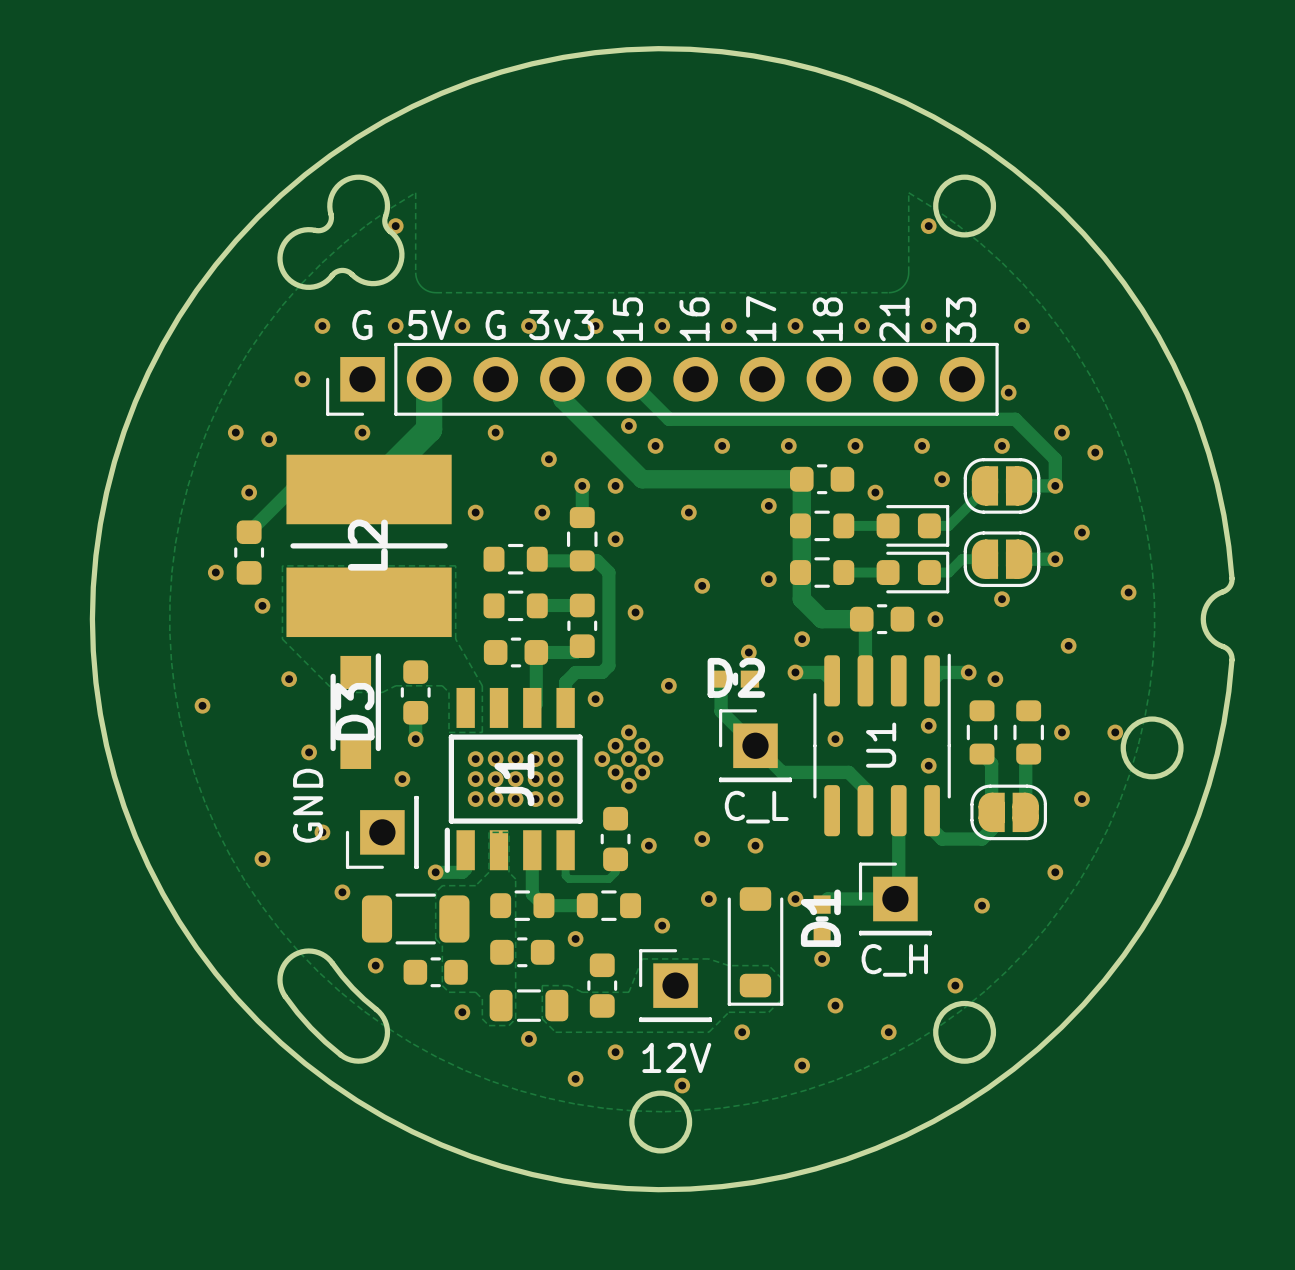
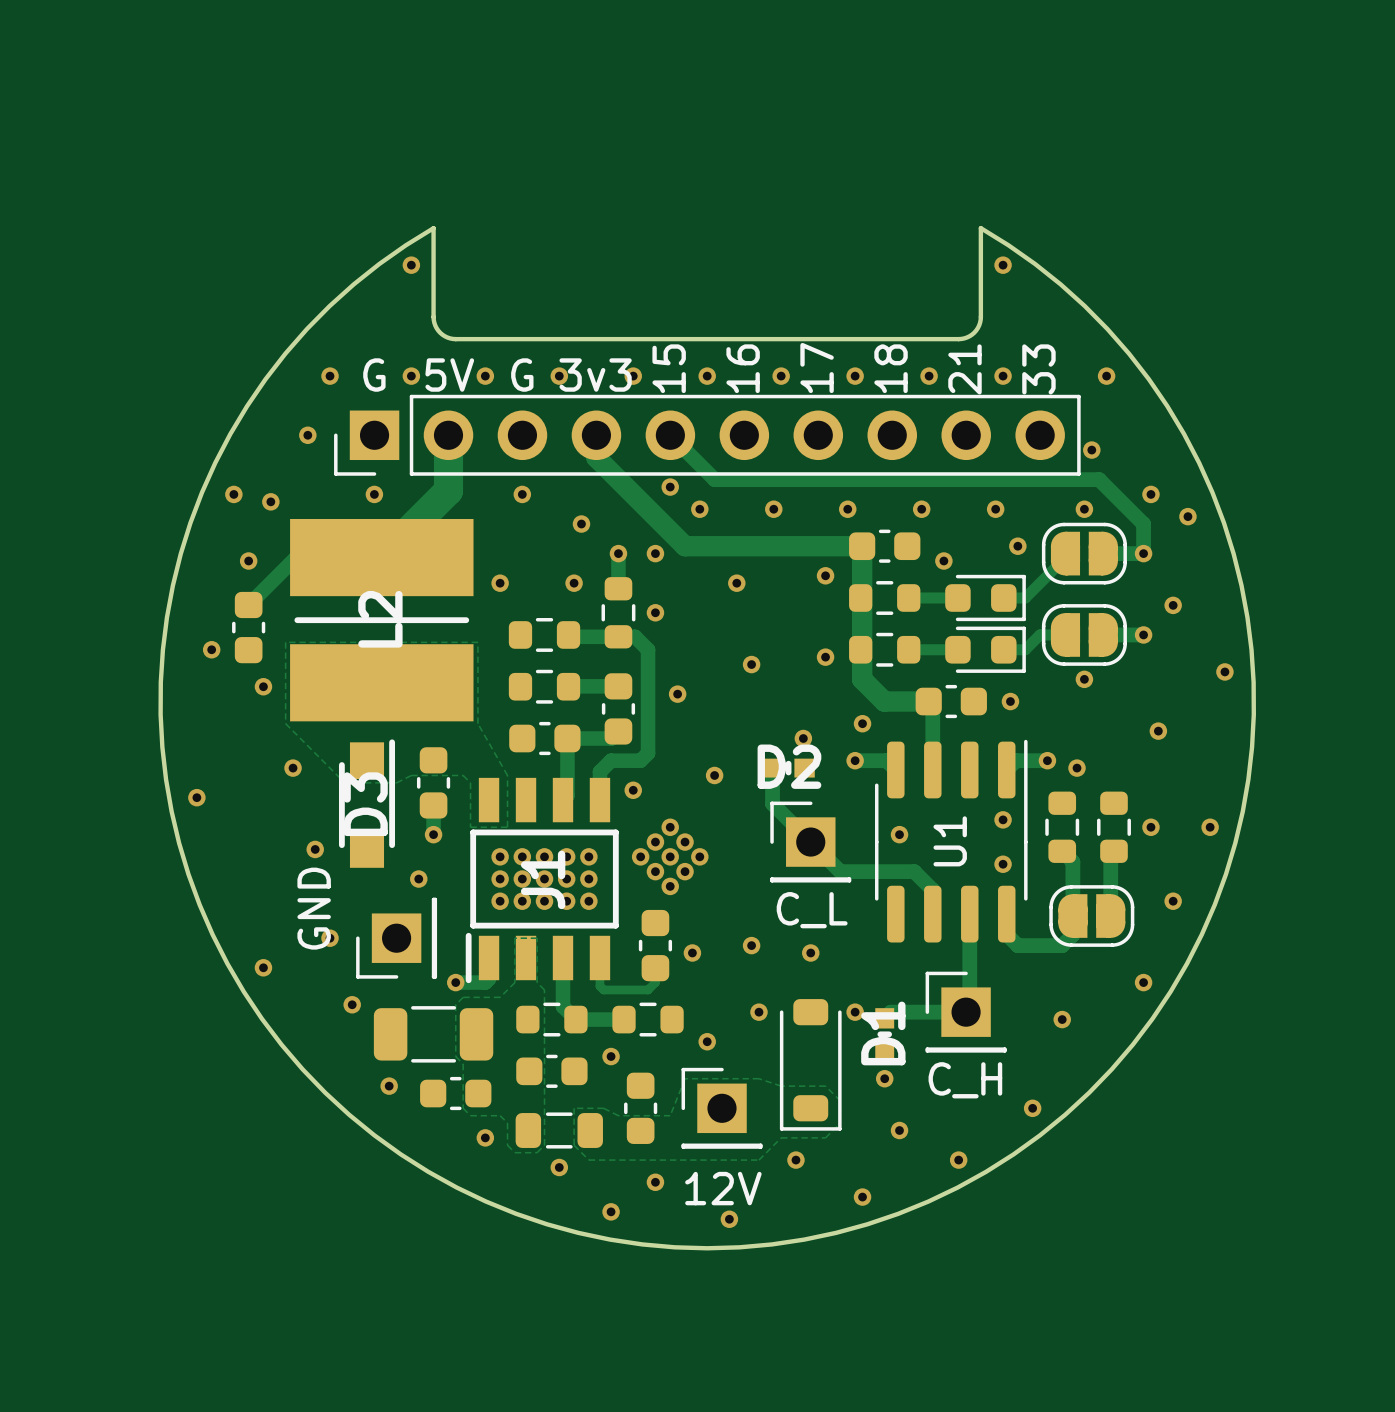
round board edge: [933, 174, 997, 238] -> none
board edge: (330, 214) (331, 196) (342, 182) (359, 177) (370, 179) (379, 185) (387, 201) (385, 224) (397, 239) (401, 249) (401, 260) (394, 273) (385, 280) (375, 283) (360, 280) (343, 270) (335, 272) (323, 283) (313, 286) (299, 285) (289, 280) (280, 264) (280, 254) (283, 243) (297, 231) (325, 228) (330, 222) (330, 214) -> none
board edge: (1231, 578) (1223, 515) (1208, 453) (1186, 393) (1173, 364) (1142, 309) (1104, 257) (1061, 211) (1038, 189) (987, 150) (933, 117) (876, 89) (846, 78) (784, 61) (722, 51) (658, 48) (626, 49) (563, 57) (532, 63) (471, 81) (412, 106) (356, 137) (305, 174) (280, 195) (236, 240) (196, 290) (179, 316) (148, 372) (124, 431) (106, 492) (95, 555) (92, 619) (93, 651) (100, 714) (114, 776) (124, 806) (148, 865) (162, 893) (196, 947) (236, 997) (280, 1042) (330, 1082) (384, 1117) (441, 1144) (471, 1156) (532, 1174) (594, 1185) (658, 1189) (690, 1189) (753, 1182) (815, 1168) (846, 1159) (905, 1135) (961, 1105) (1013, 1069) (1061, 1027) (1083, 1004) (1104, 980) (1142, 928) (1173, 873) (1198, 815) (1217, 754) (1228, 691) (1231, 659) (1227, 649) (1216, 643) (1208, 636) (1204, 626) (1203, 615) (1208, 602) (1216, 594) (1227, 588) (1231, 578) -> (433, 228) (379, 264) (329, 306) (285, 353) (265, 379) (247, 406) (215, 462) (201, 492) (180, 553) (166, 617) (162, 649) (160, 682) (162, 747) (166, 779) (179, 843) (199, 904) (227, 963) (261, 1018) (302, 1069) (349, 1114) (374, 1135) (428, 1171) (456, 1187) (486, 1201) (546, 1224) (610, 1239) (642, 1244) (707, 1248) (772, 1244) (804, 1239) (867, 1224) (928, 1201) (986, 1171) (1039, 1135) (1089, 1092) (1111, 1069) (1152, 1018) (1170, 991) (1201, 934) (1214, 904) (1235, 843) (1248, 779) (1253, 714) (1253, 682) (1247, 617) (1233, 553) (1223, 522) (1199, 462) (1184, 434) (1148, 379) (1107, 329) (1084, 306) (1035, 264) (980, 228) (980, 322) (972, 334) (958, 339) (450, 338) (438, 330) (433, 319) (433, 228)
round board edge: [1120, 716, 1184, 780] -> none
board edge: (332, 963) (352, 988) (379, 1012) (385, 1021) (387, 1032) (385, 1043) (378, 1052) (369, 1059) (354, 1060) (340, 1055) (310, 1027) (281, 990) (279, 979) (281, 969) (287, 960) (295, 954) (305, 951) (315, 951) (325, 956) (332, 963) -> none
round board edge: [933, 1000, 997, 1064] -> none
round board edge: [629, 1090, 693, 1154] -> none

